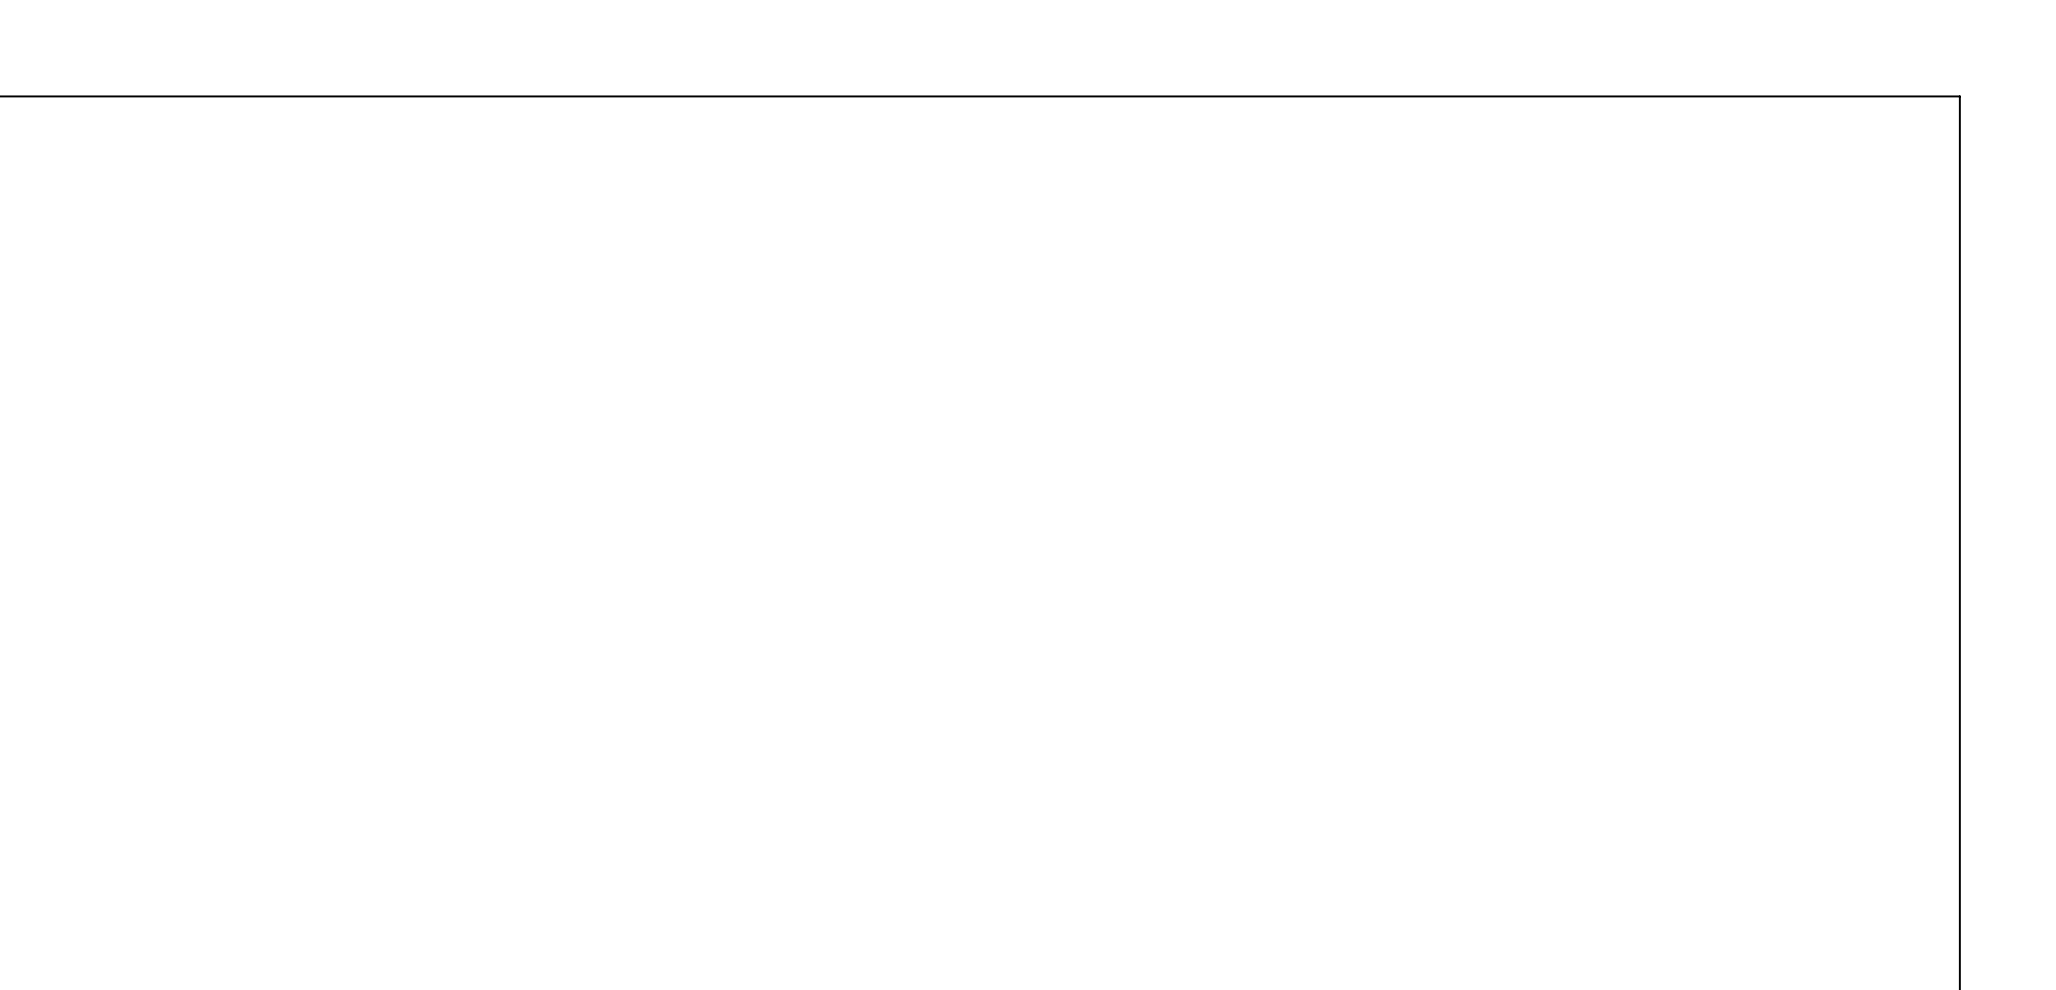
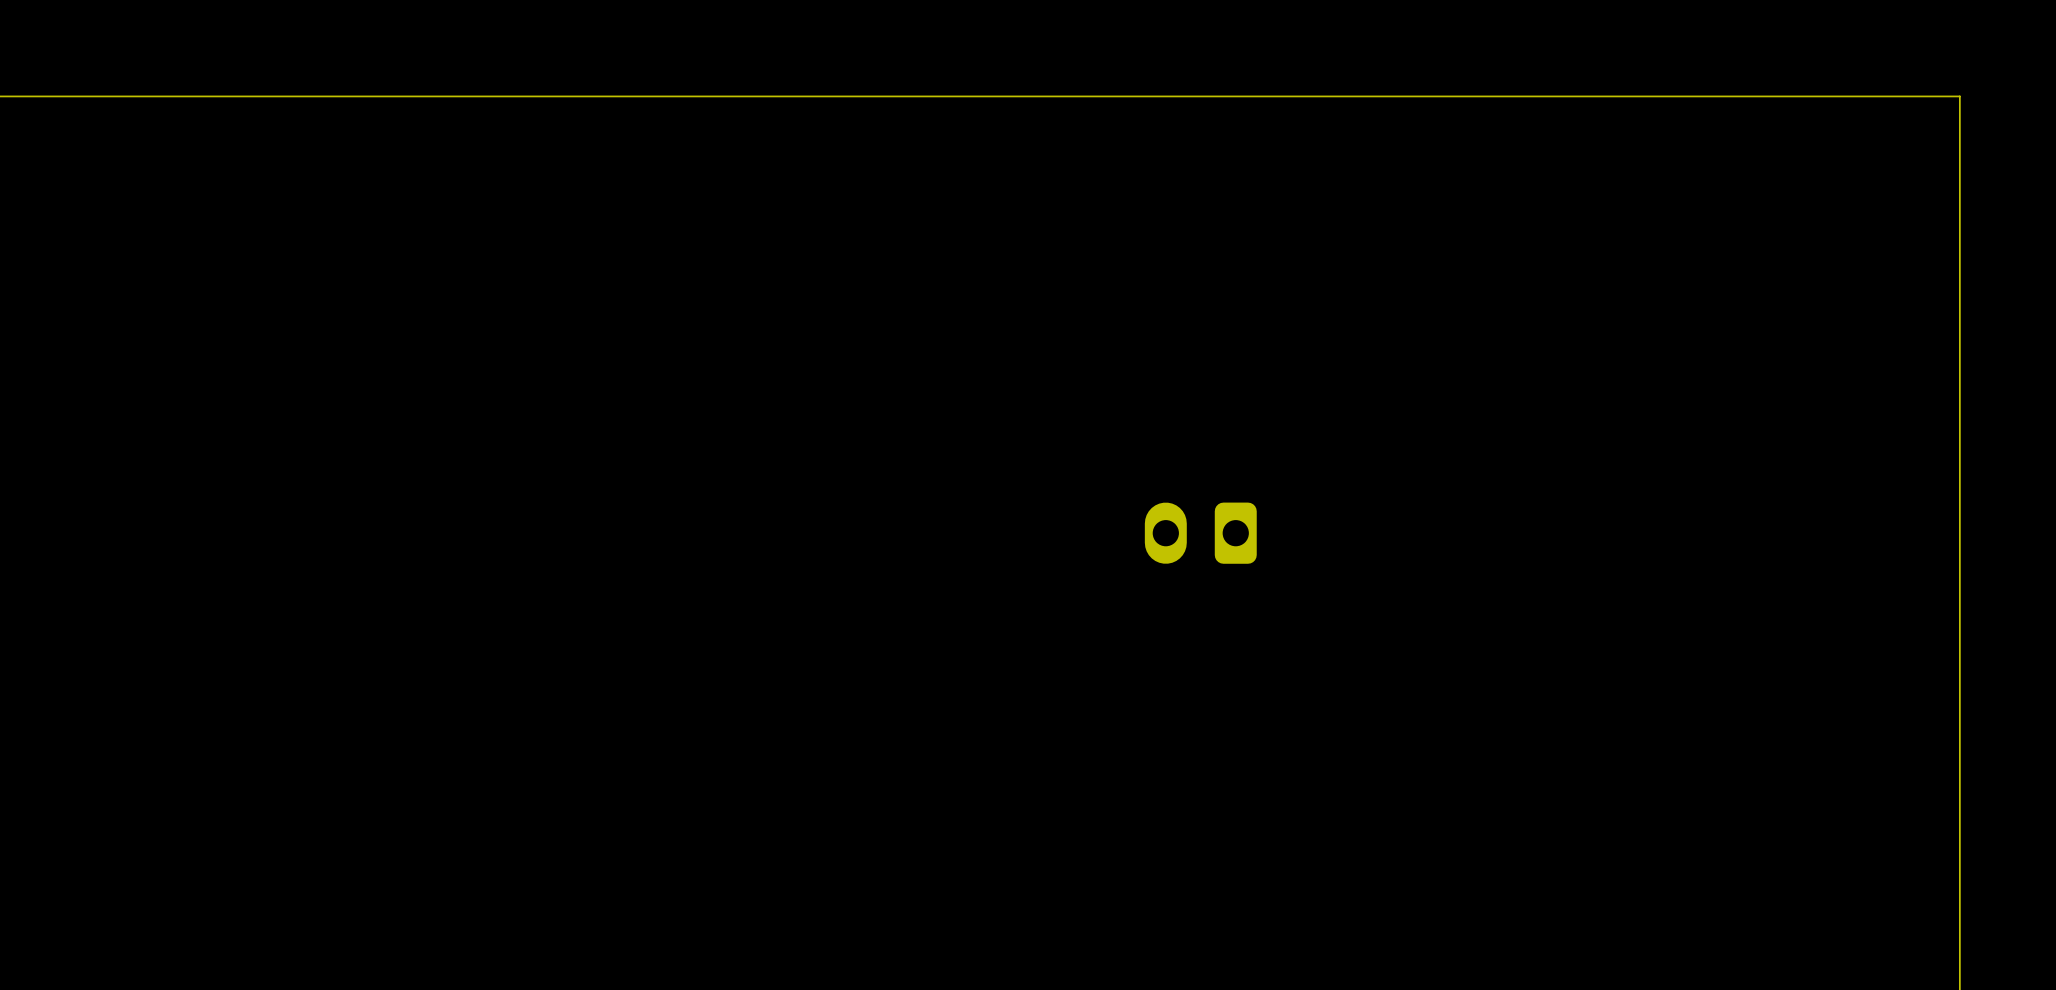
part: none -> (1200, 533)

